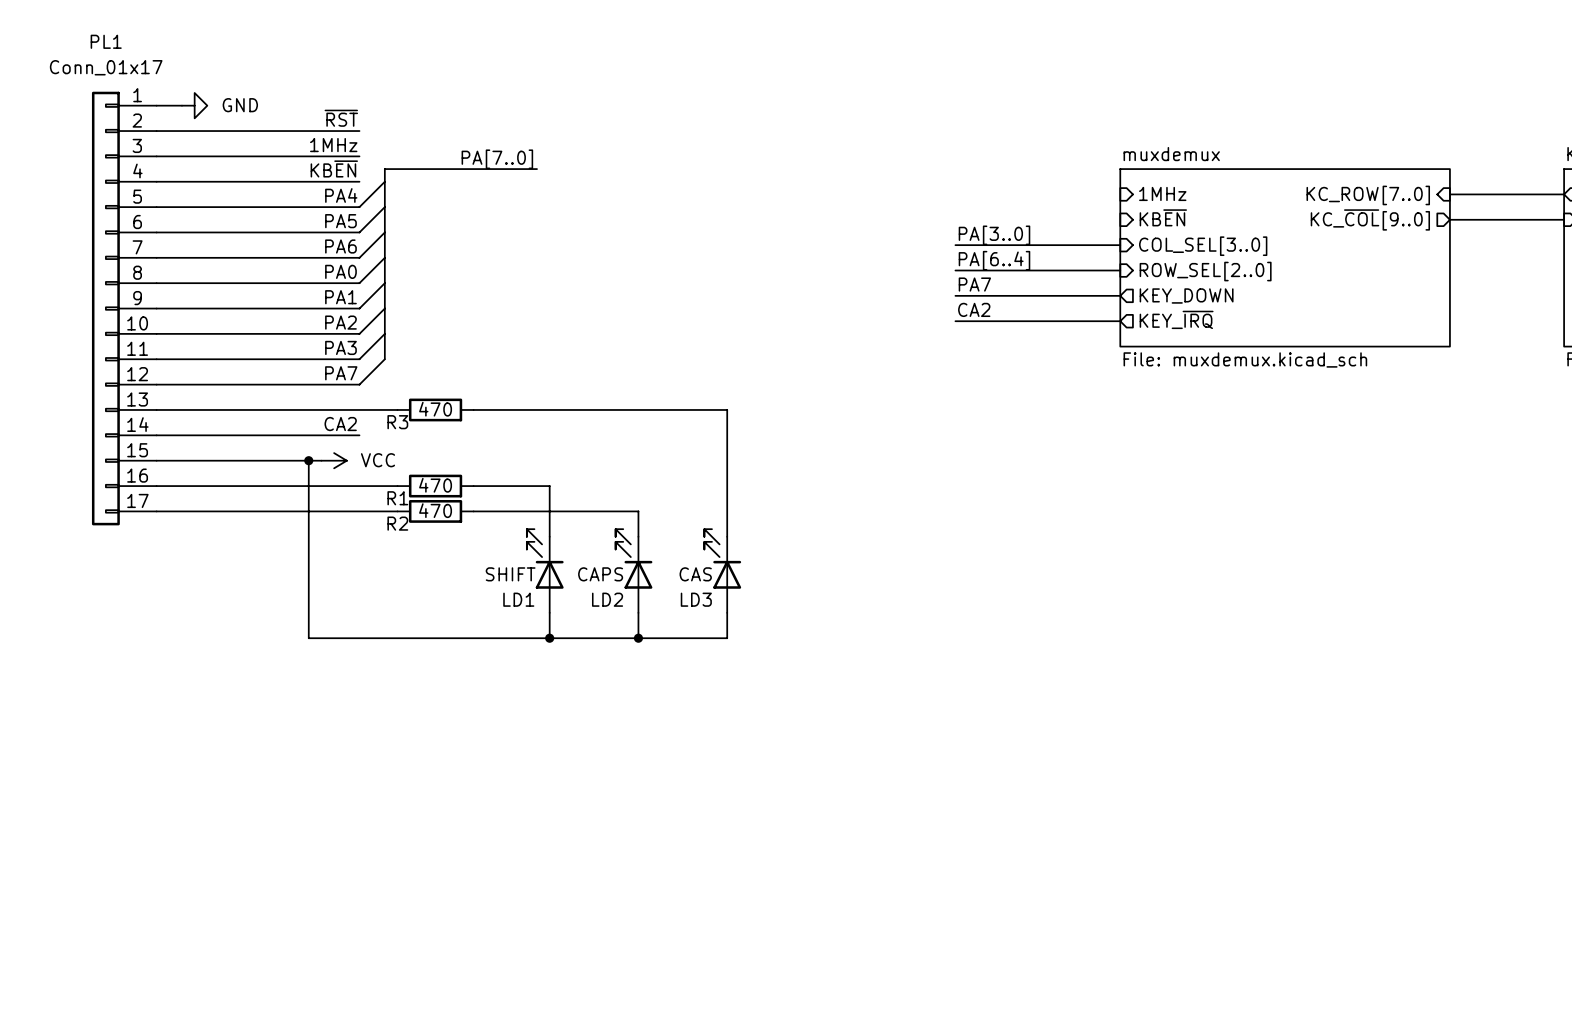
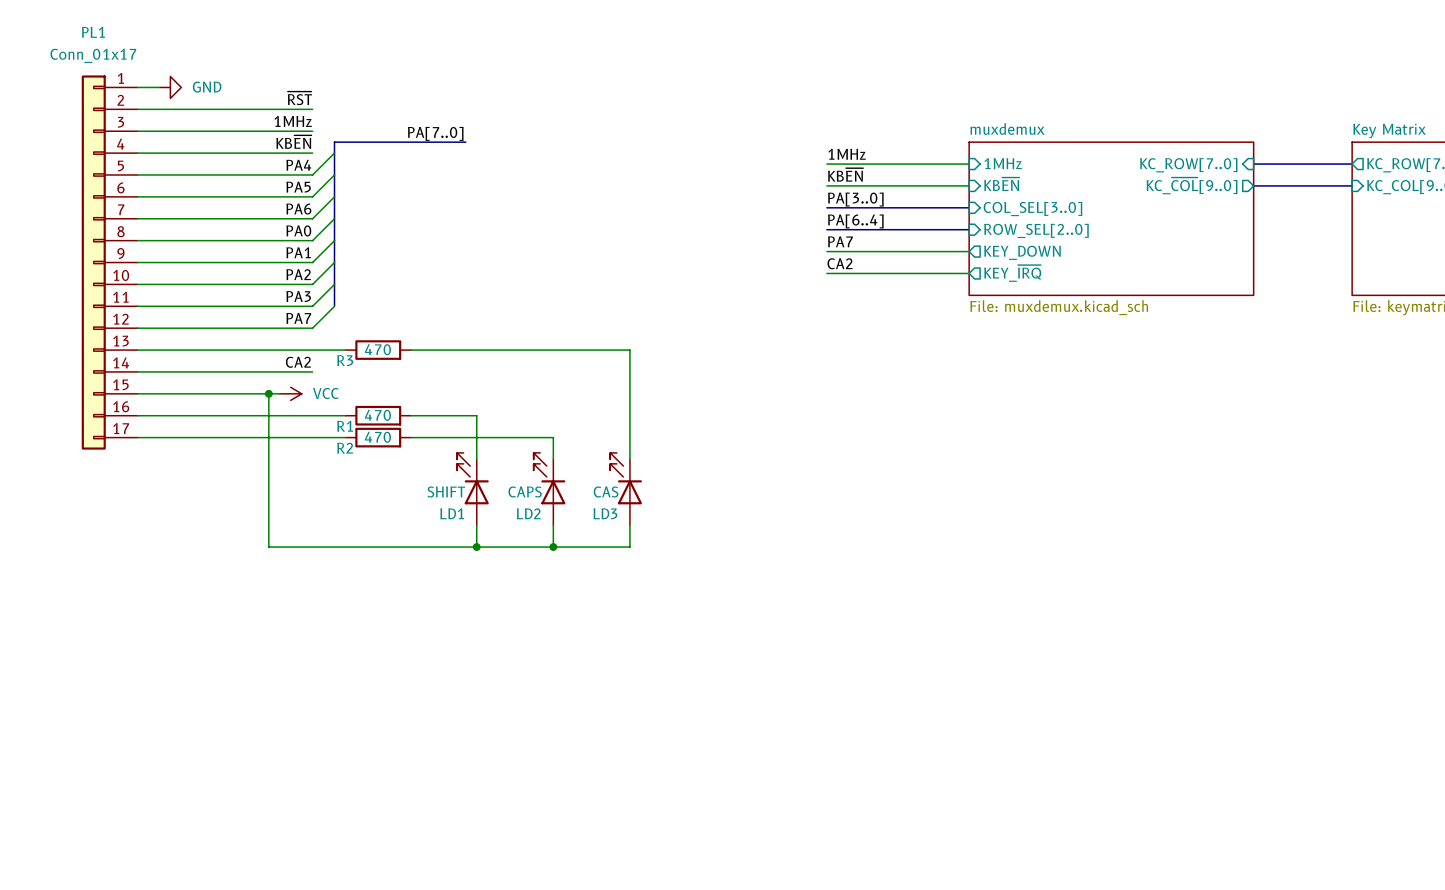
label: none -> 1MHz (847, 154)
wire: none -> (826, 164) (969, 164)
label: none -> KB~{EN} (845, 174)
wire: none -> (826, 185) (969, 185)

